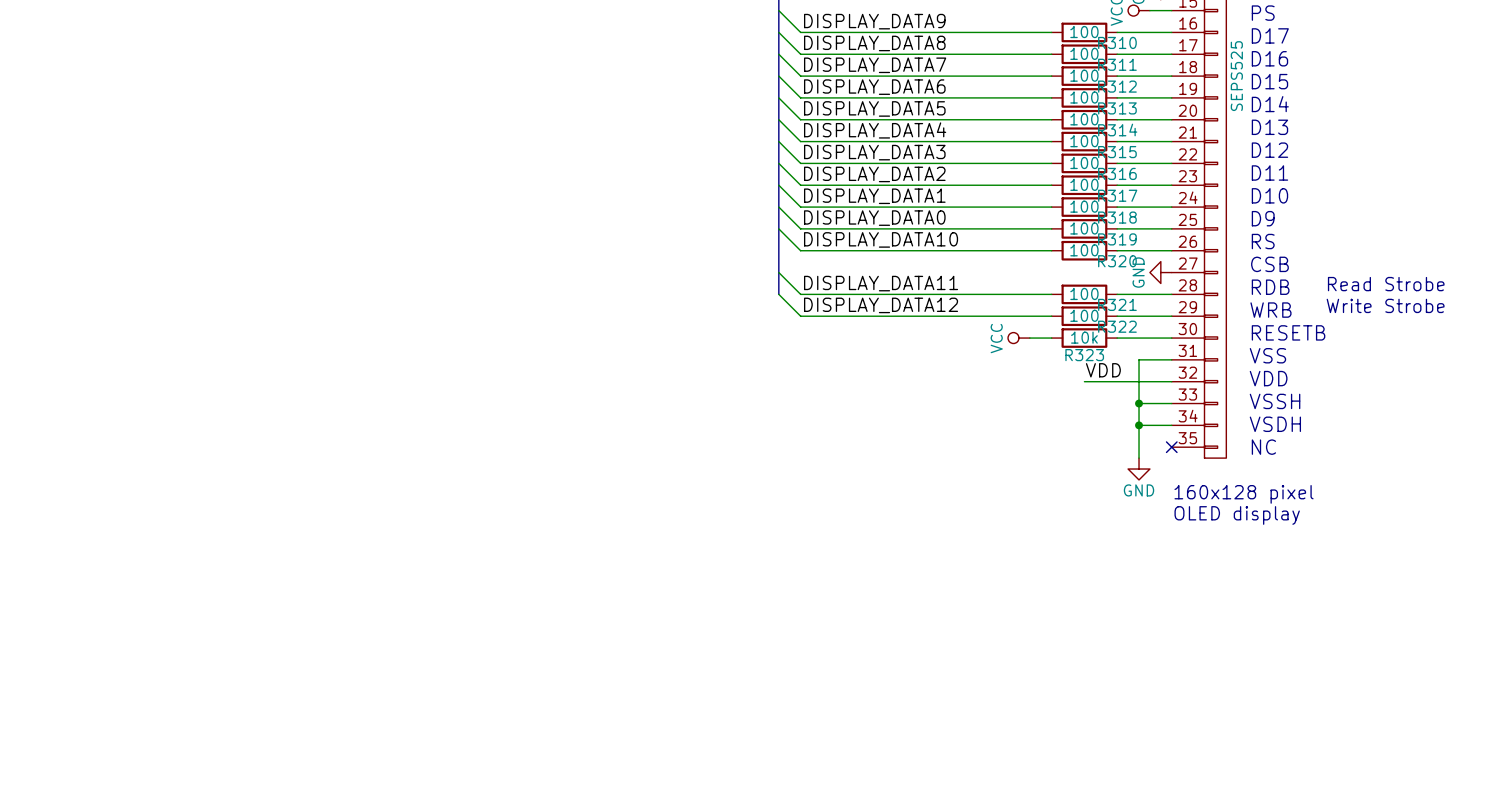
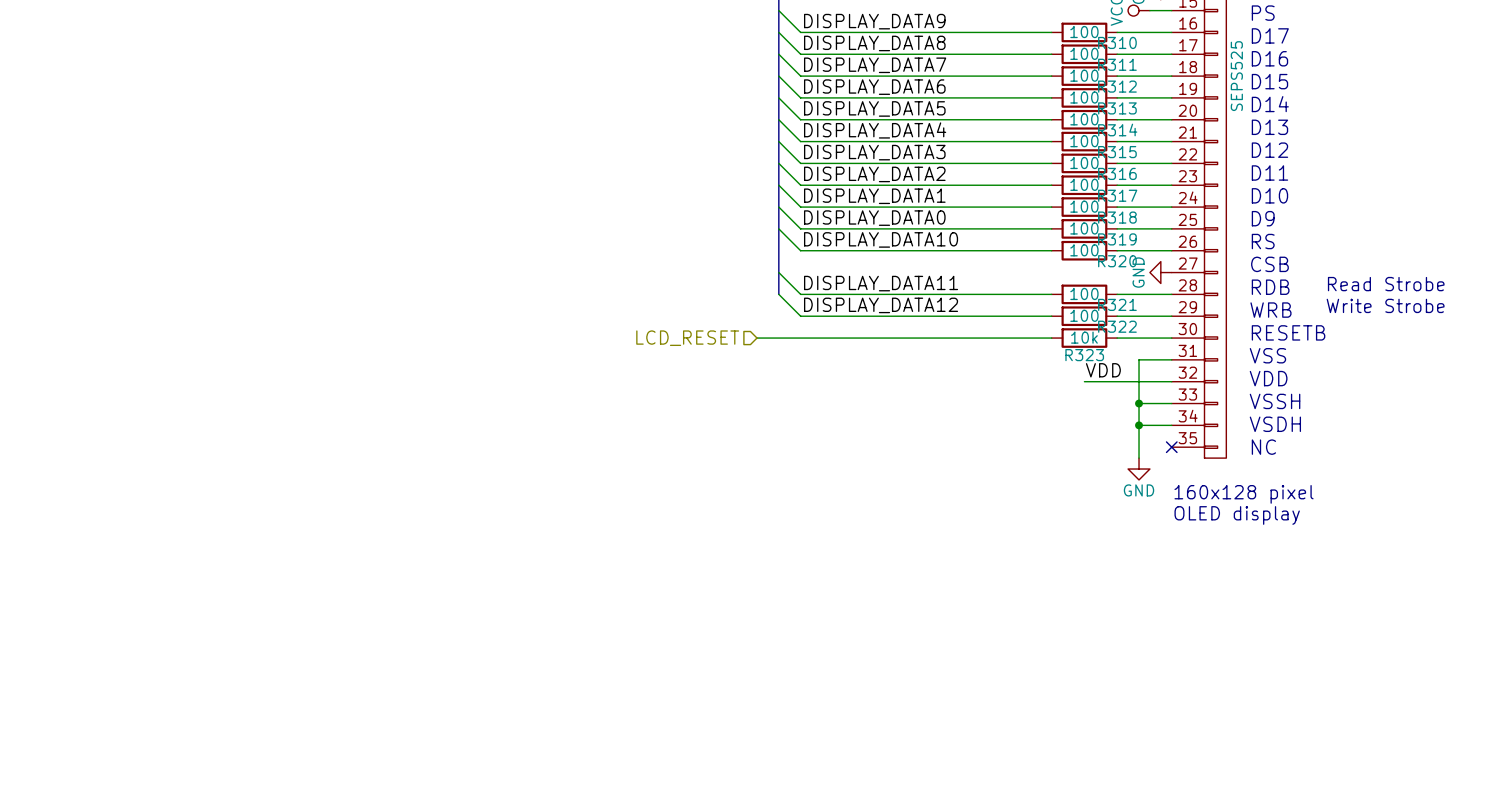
hierarchical label: none -> LCD_RESET (687, 338)
wire: none -> (757, 338) (1029, 338)
power symbol: VCC (1018, 338) -> none

